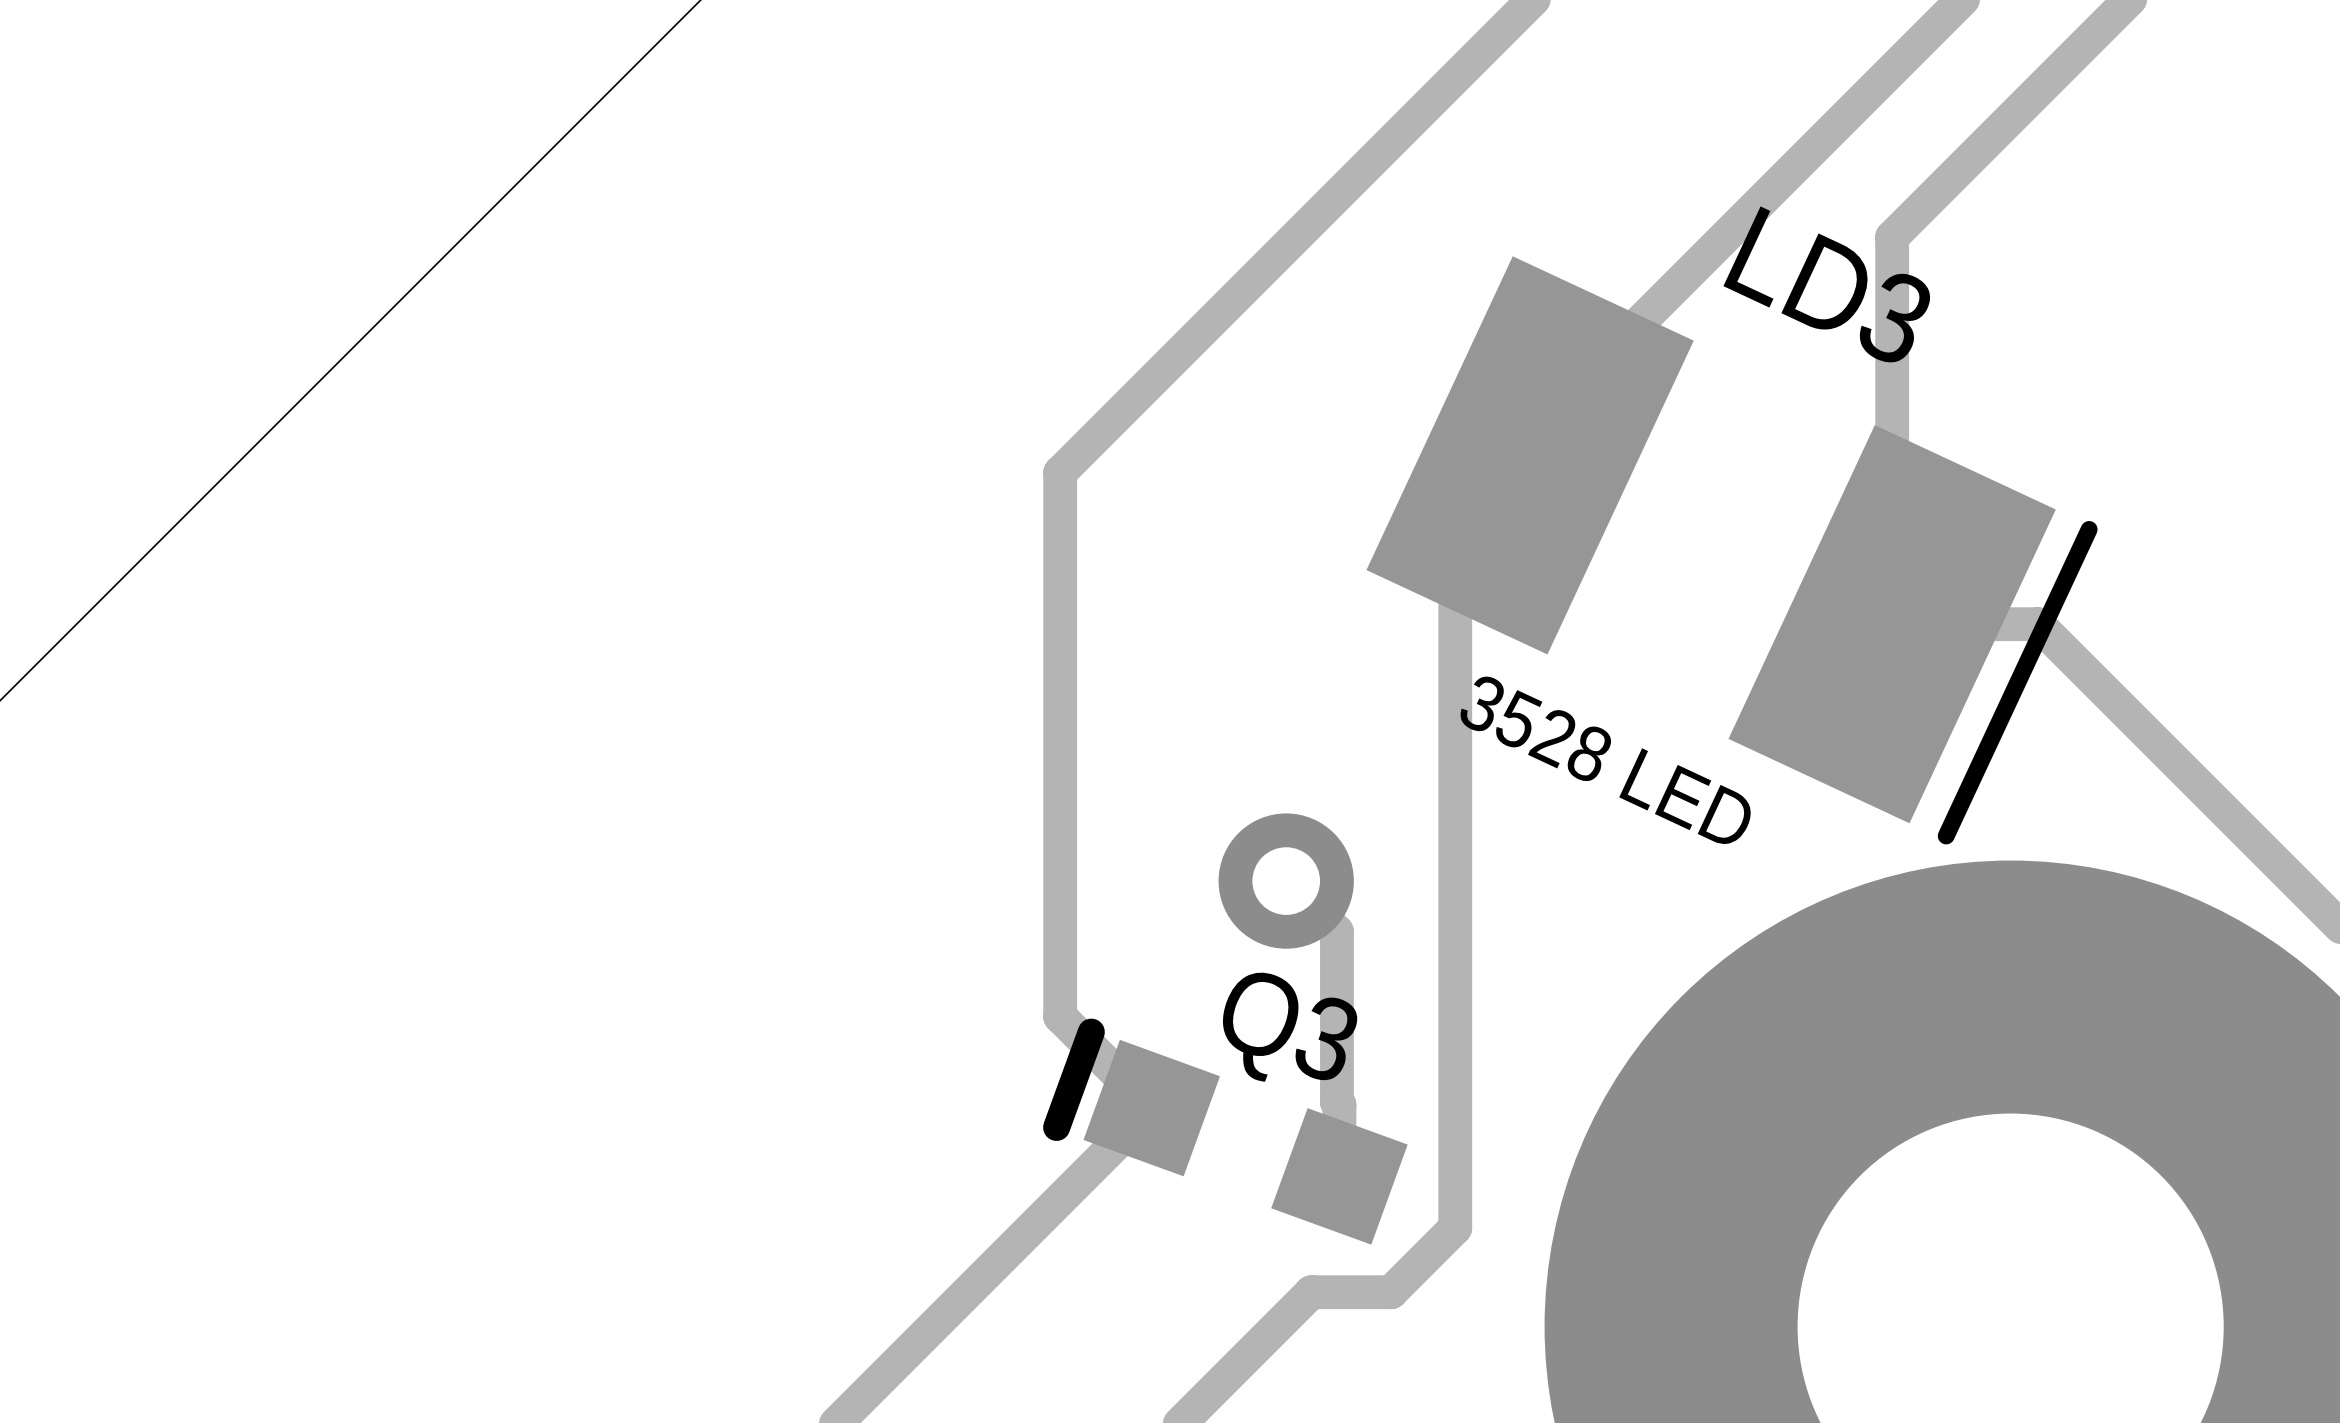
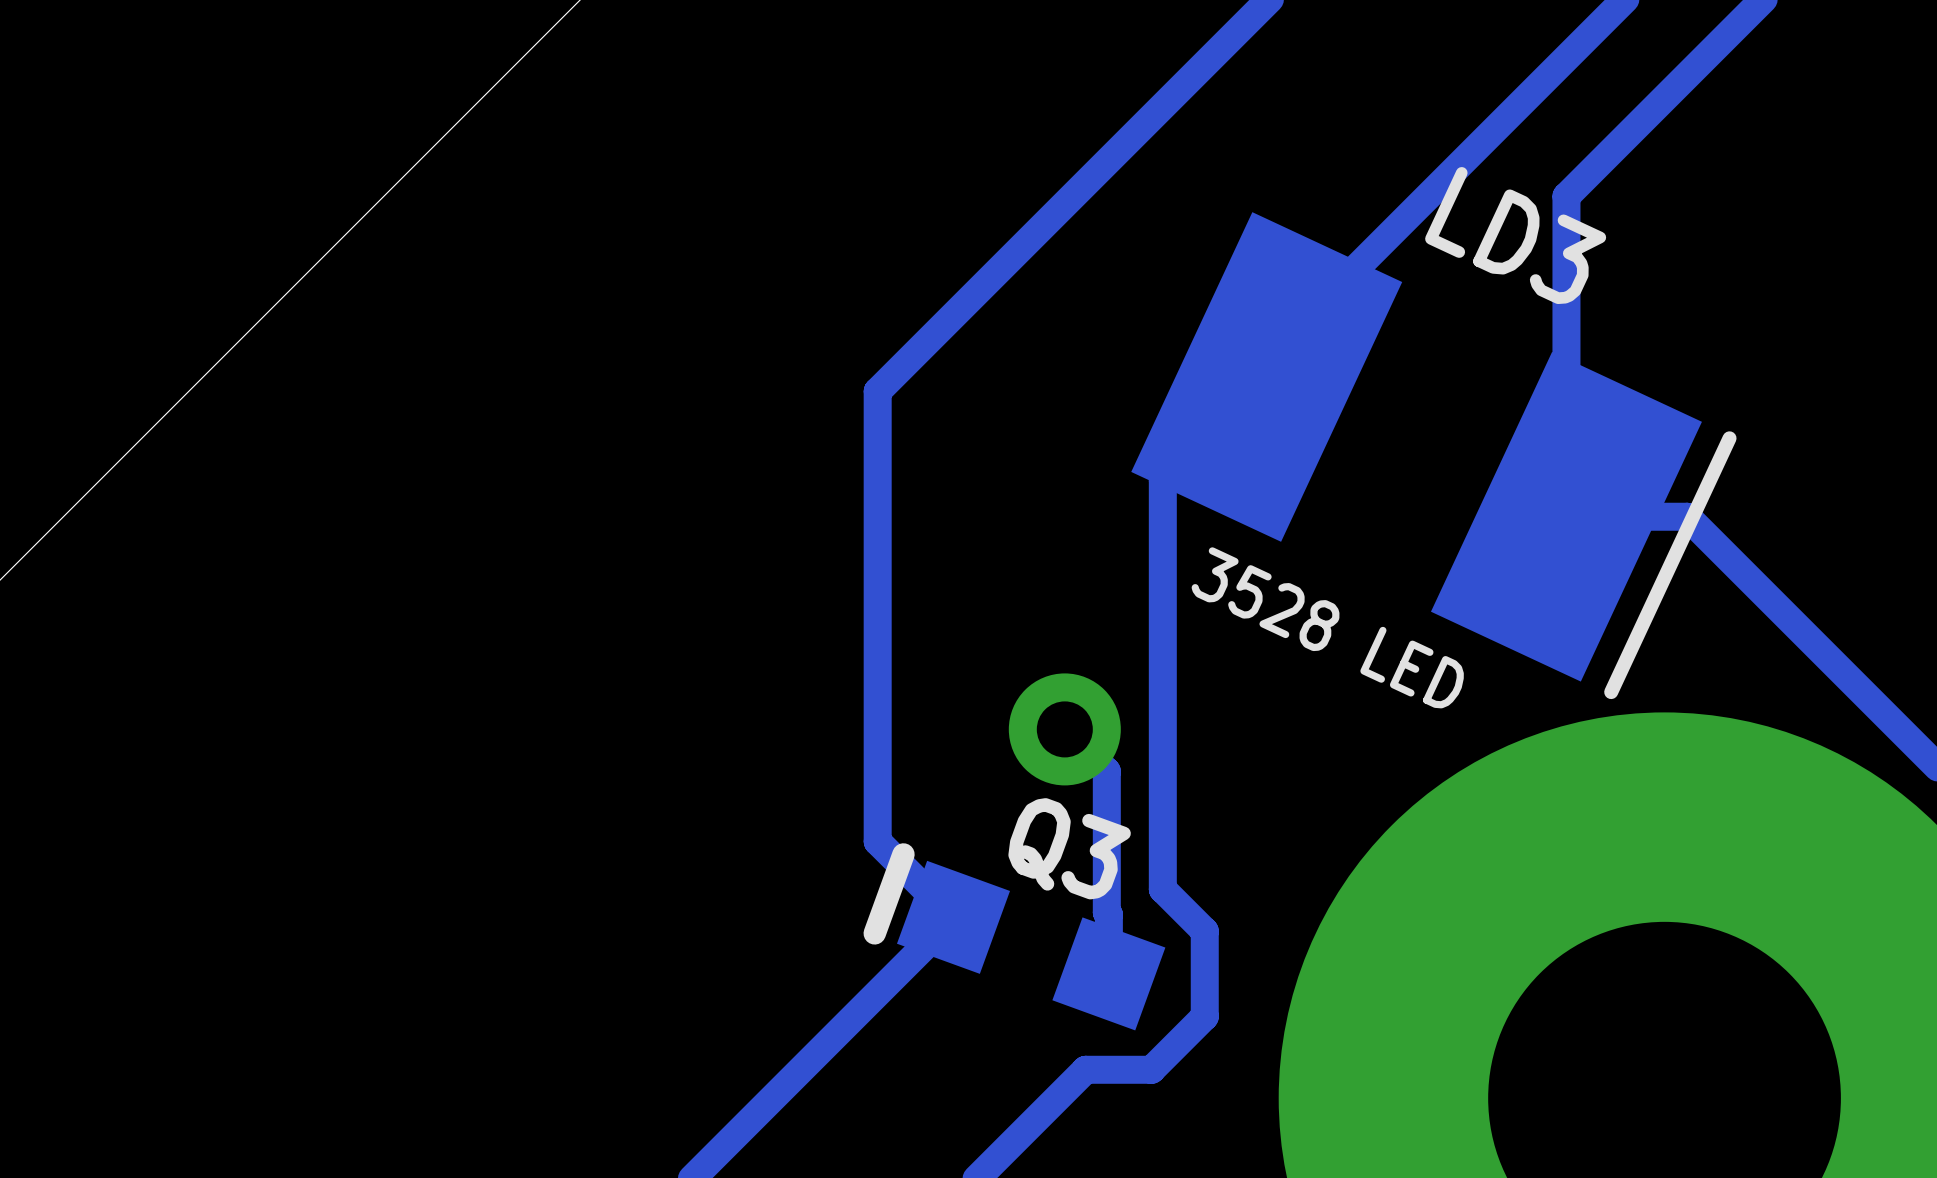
track: (1455, 530) (1455, 1124) -> (1204, 438) (1162, 480) (1162, 889) (1204, 931)

